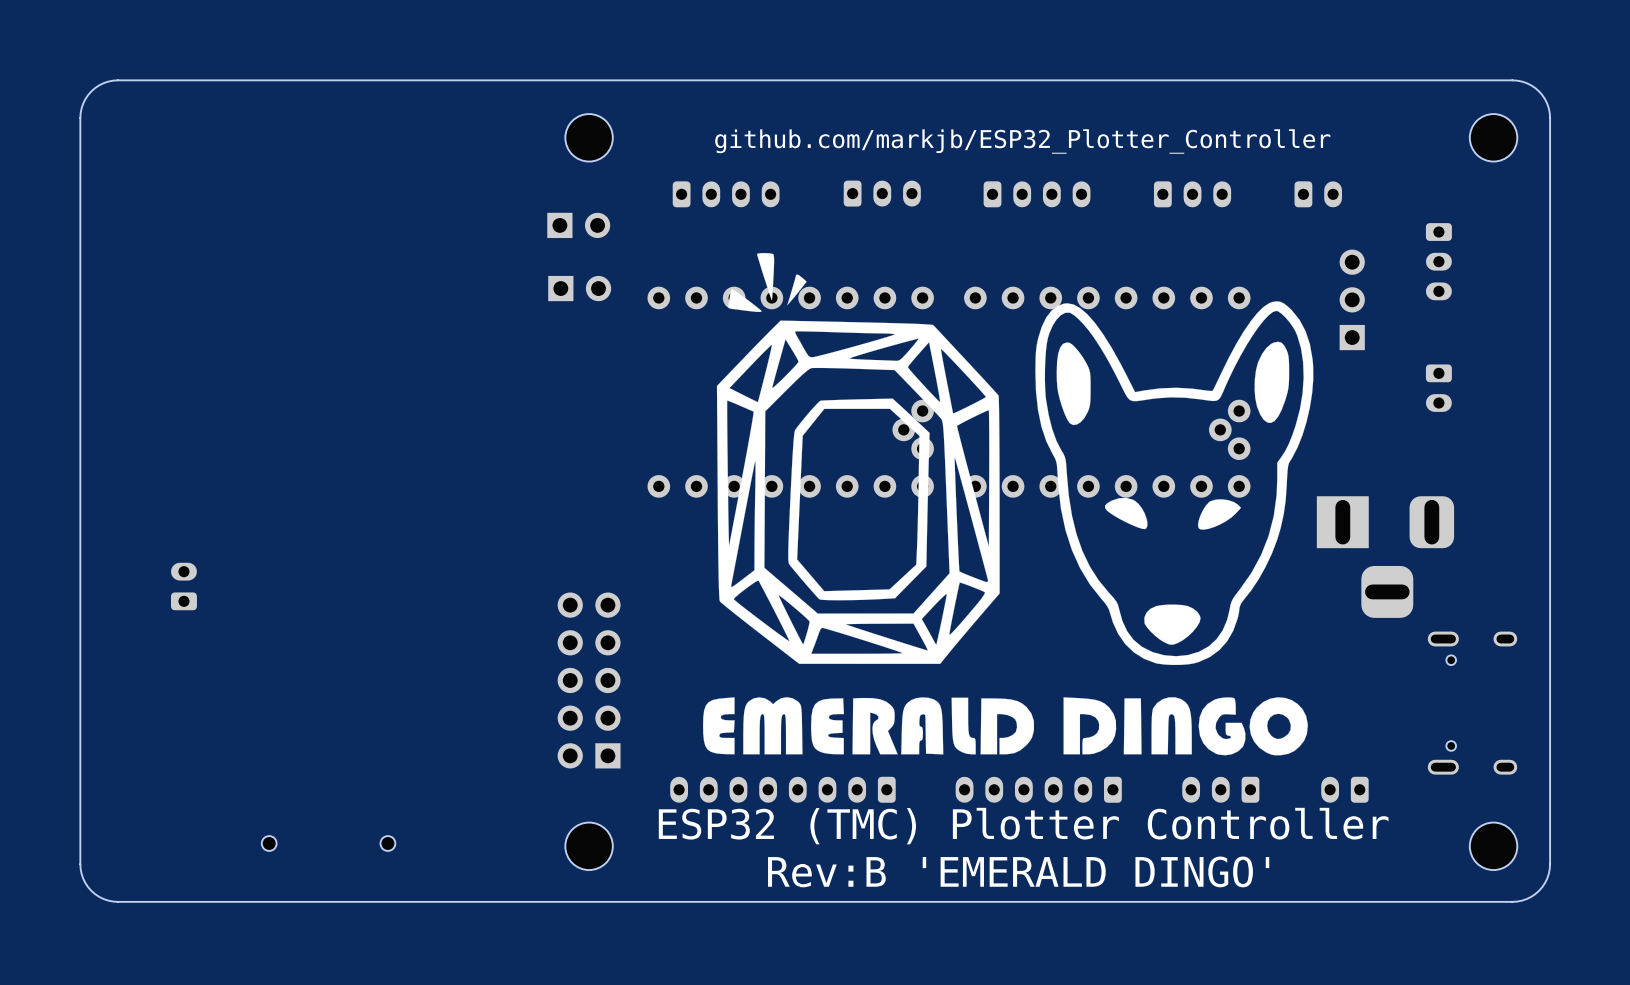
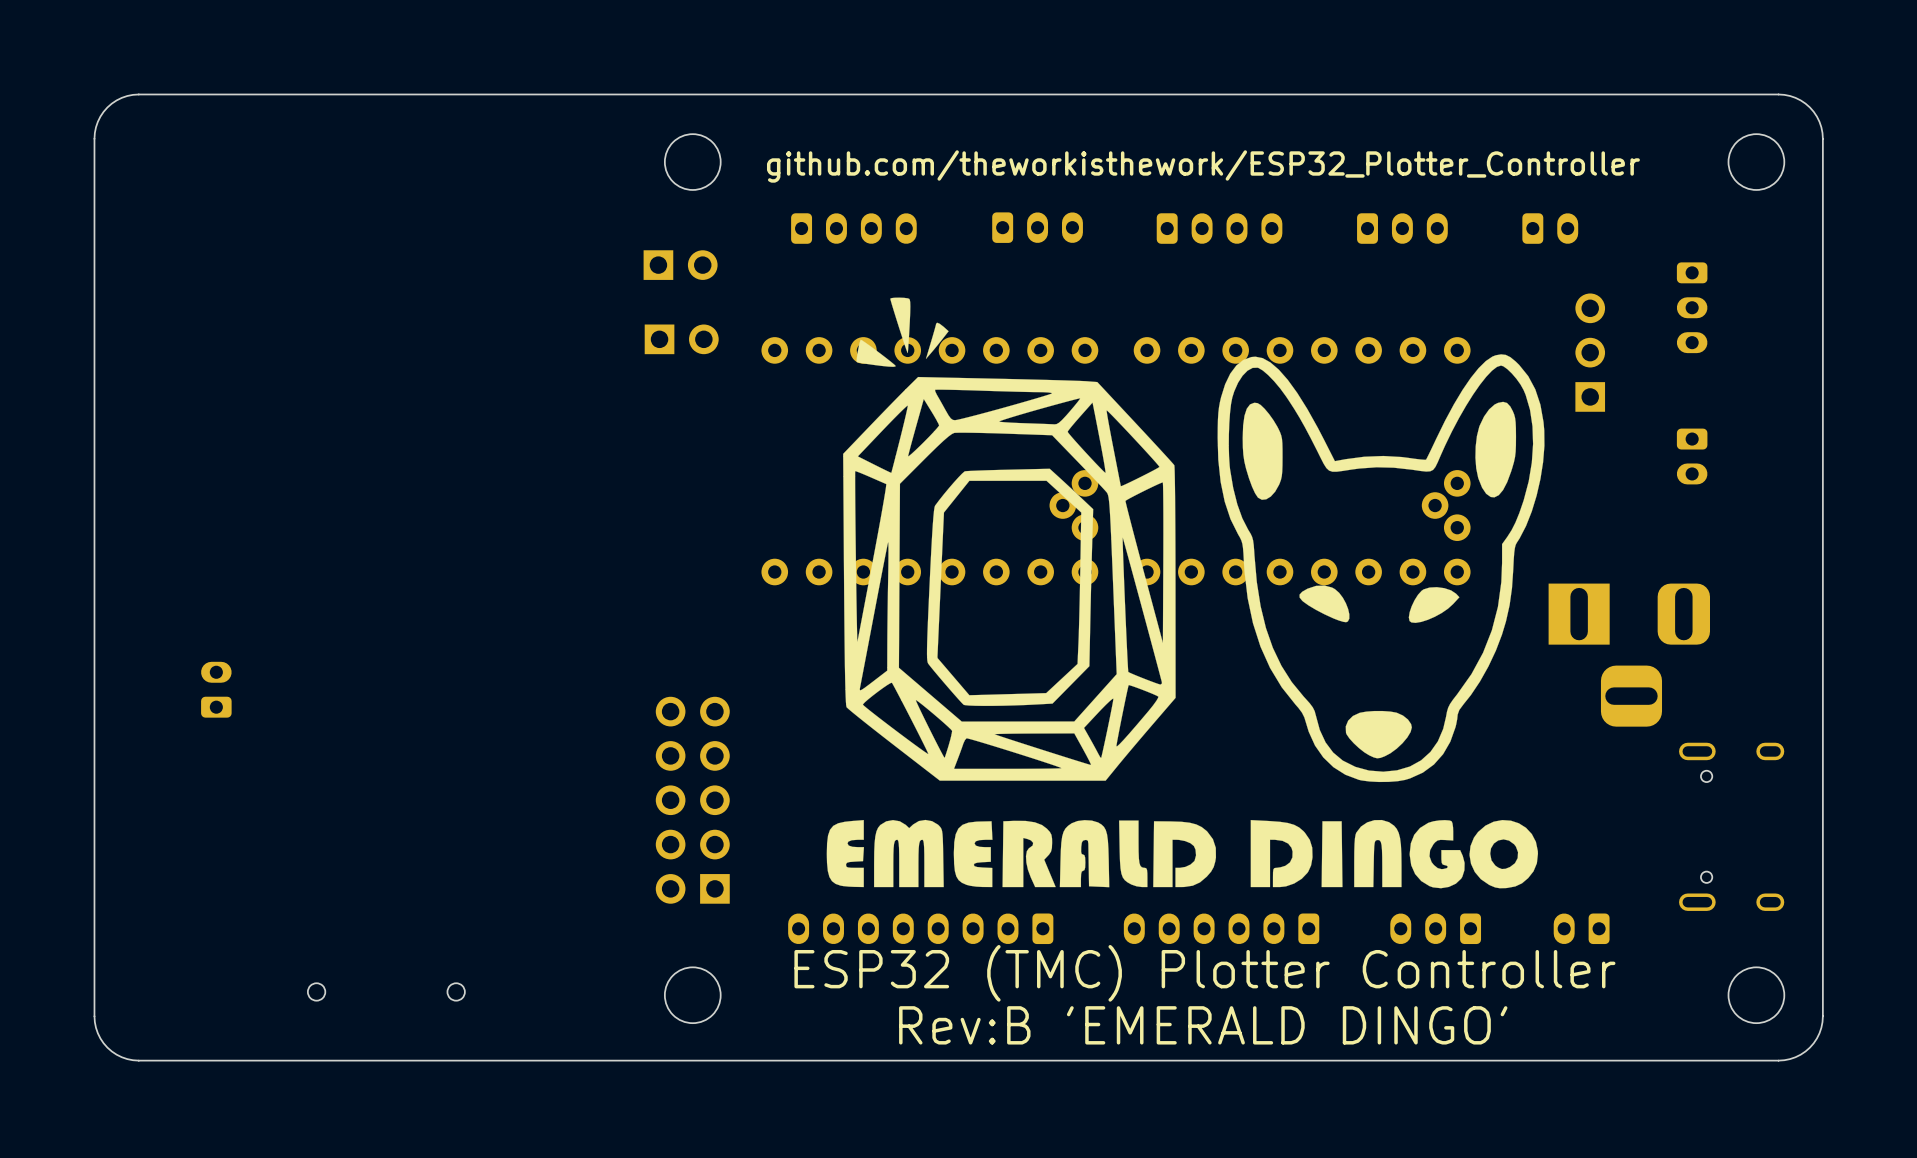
text: github.com/markjb/ESP32_Plotter_Controller (1022, 141) -> github.com/theworkisthework/ESP32_Plotter_Controller (1203, 166)

